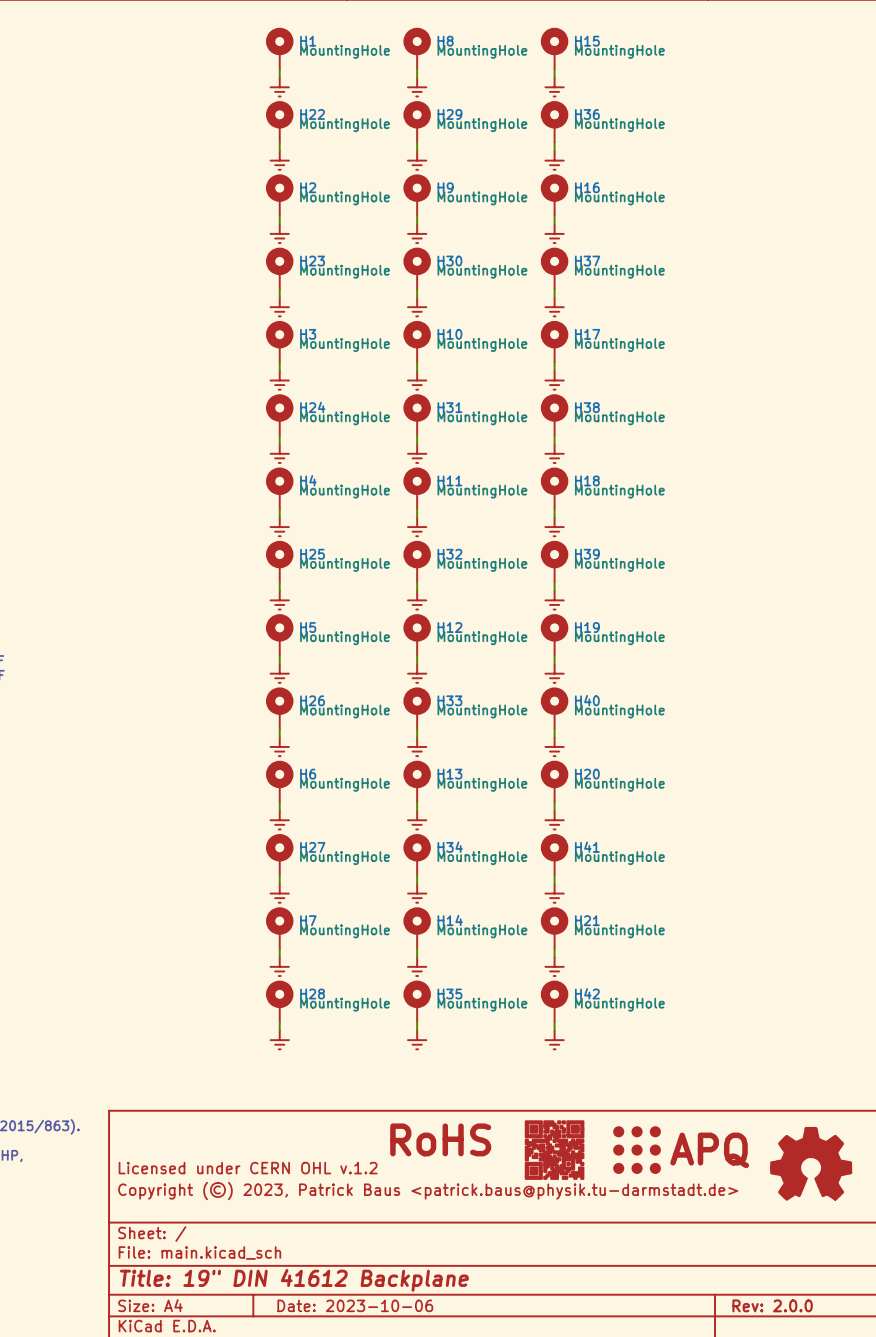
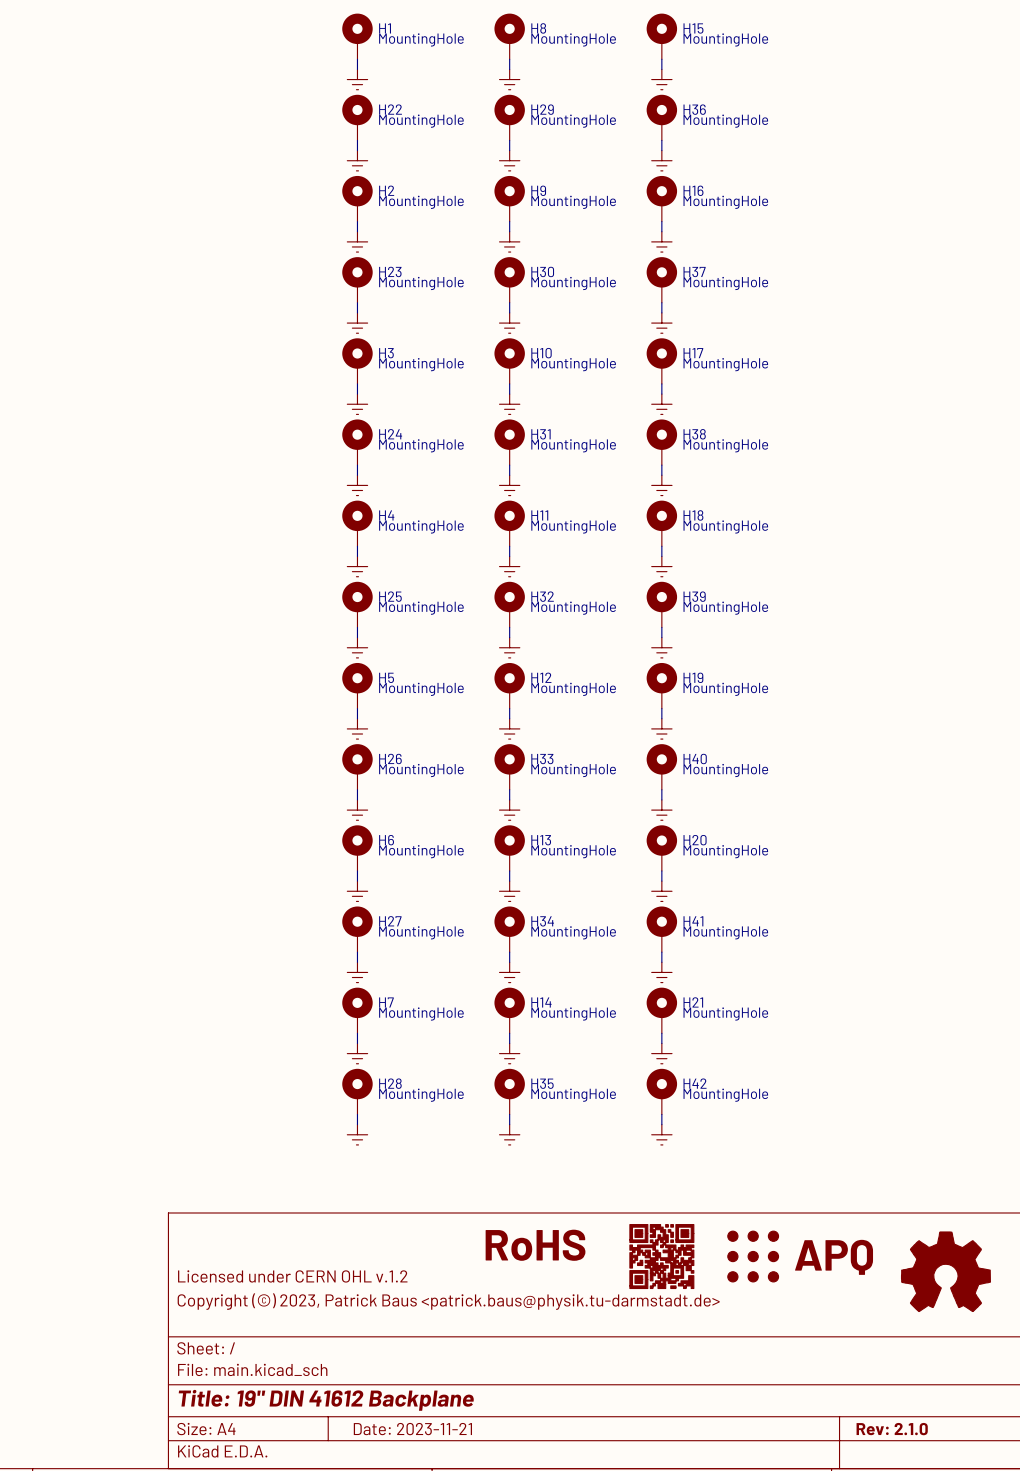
title block: Date: 2023-10-06 (355, 1305) -> Date: 2023-11-21 (412, 1429)
title block: Rev: 2.0.0 (772, 1305) -> Rev: 2.1.0 (892, 1429)

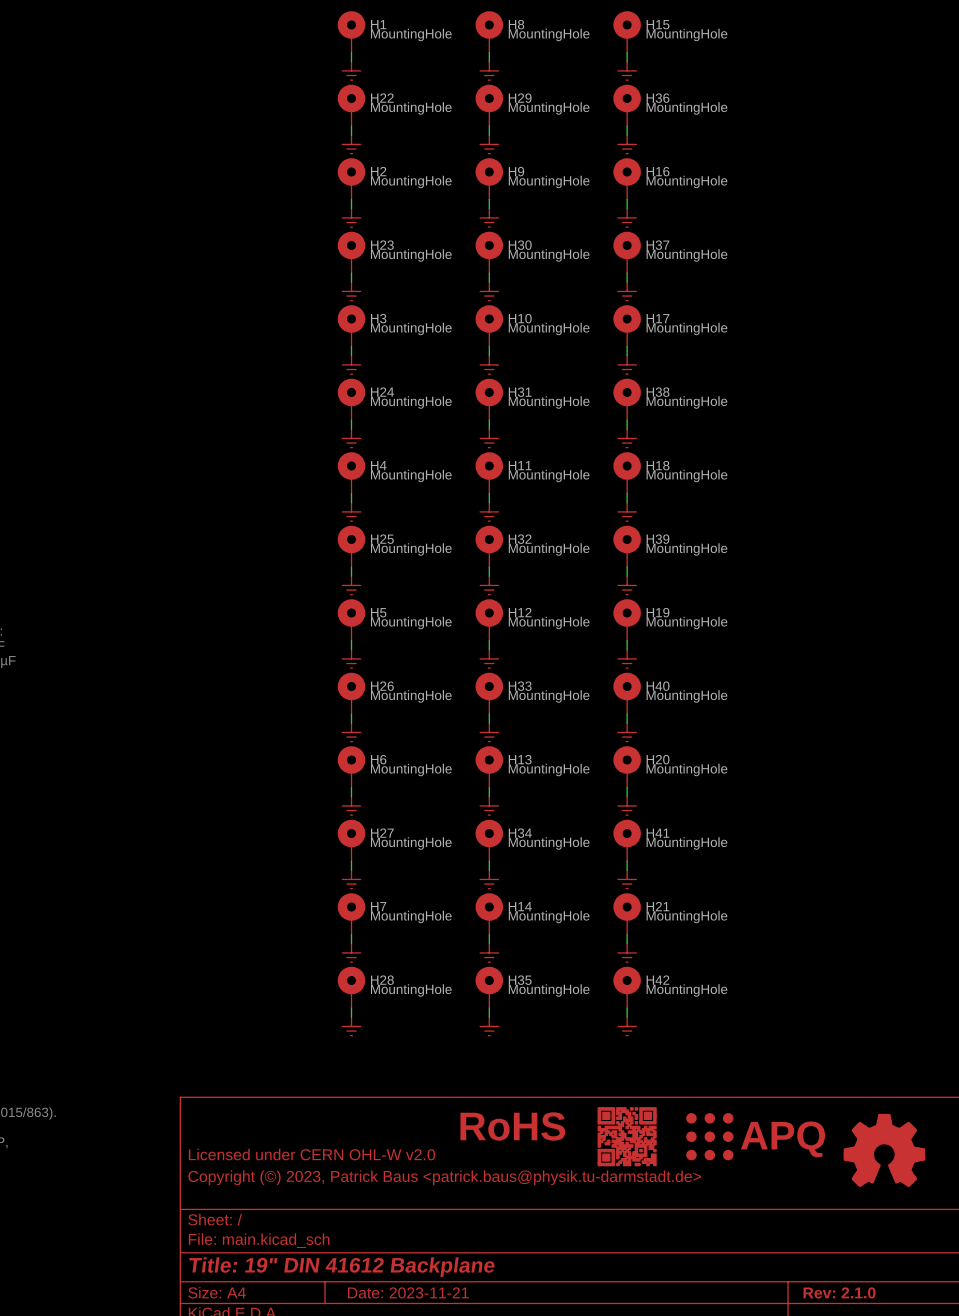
title block: Licensed under CERN OHL v.1.2 (292, 1276) -> Licensed under CERN OHL-W v2.0 (311, 1154)

